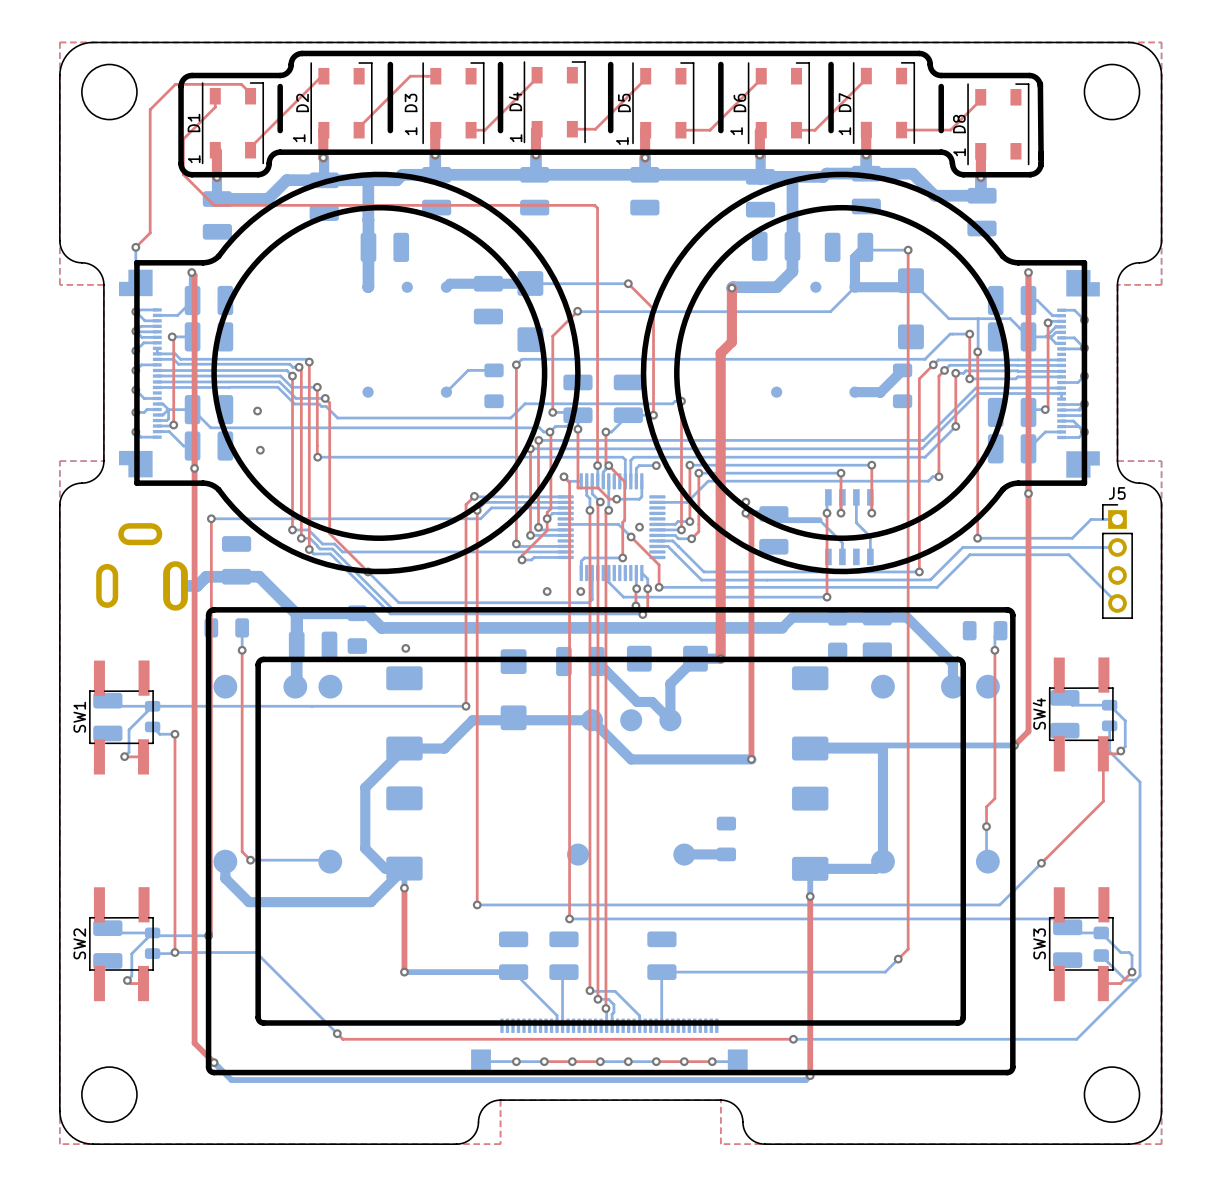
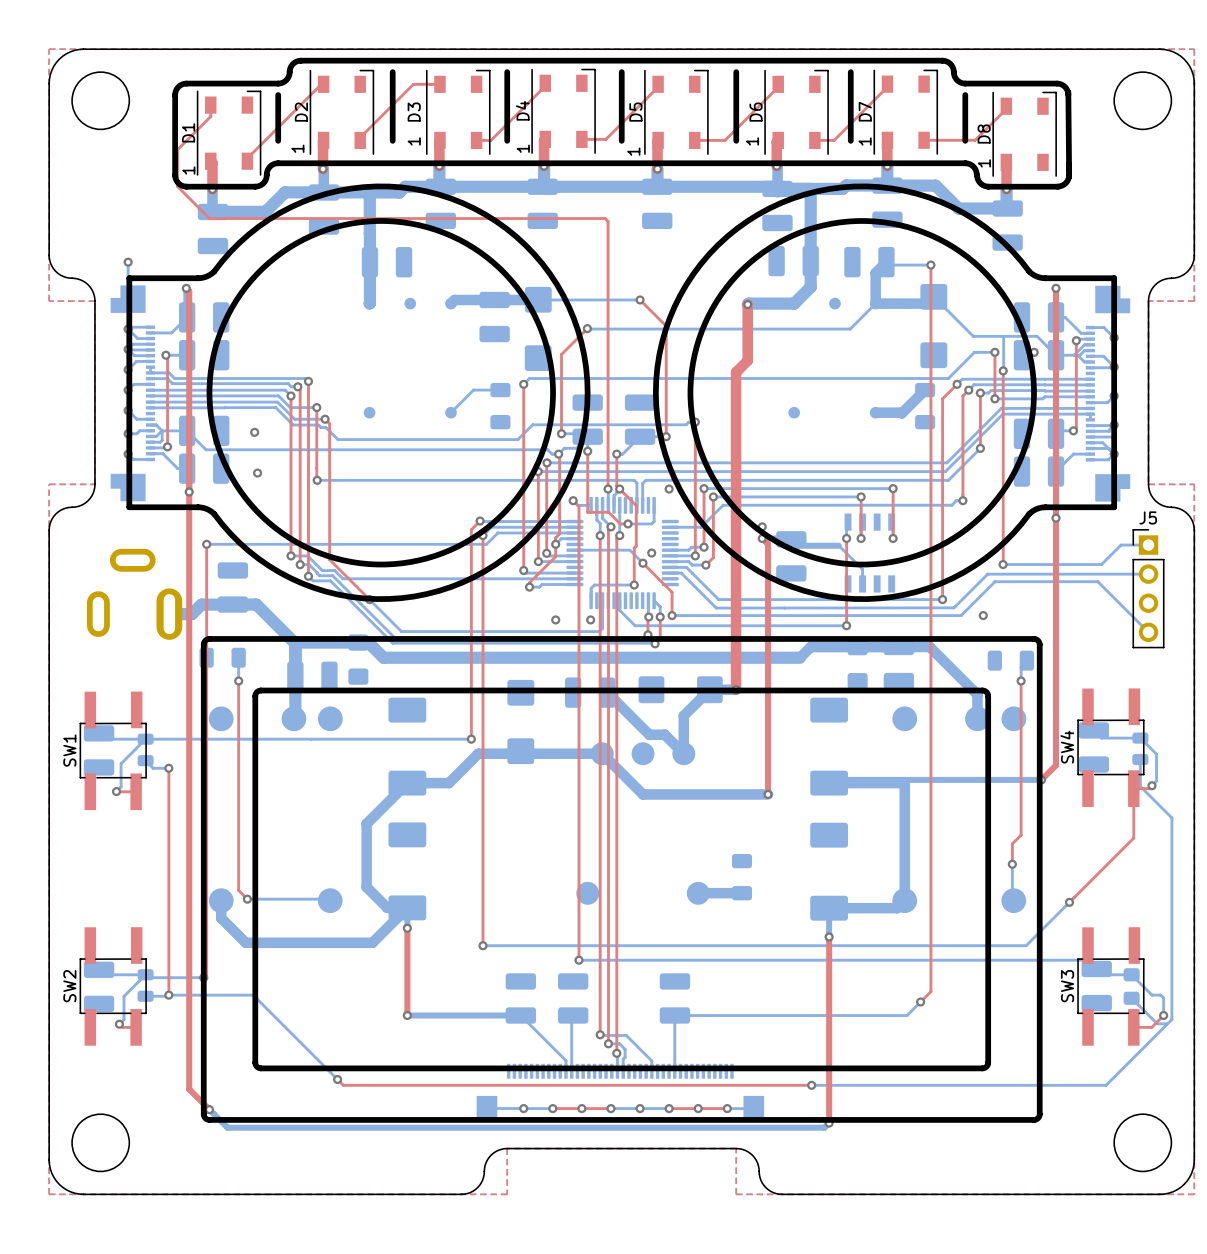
top track: (250, 96) (250, 93) (241, 84) (175, 84) (150, 109) (150, 232) (135, 247) -> none
via: none -> (1034, 352)
bottom track: (656, 465) (639, 465) (636, 468) (636, 481) -> none
bottom track: (856, 497) (856, 522) (870, 536) (870, 556) -> none
via: none -> (983, 615)
via: (405, 648) -> none

